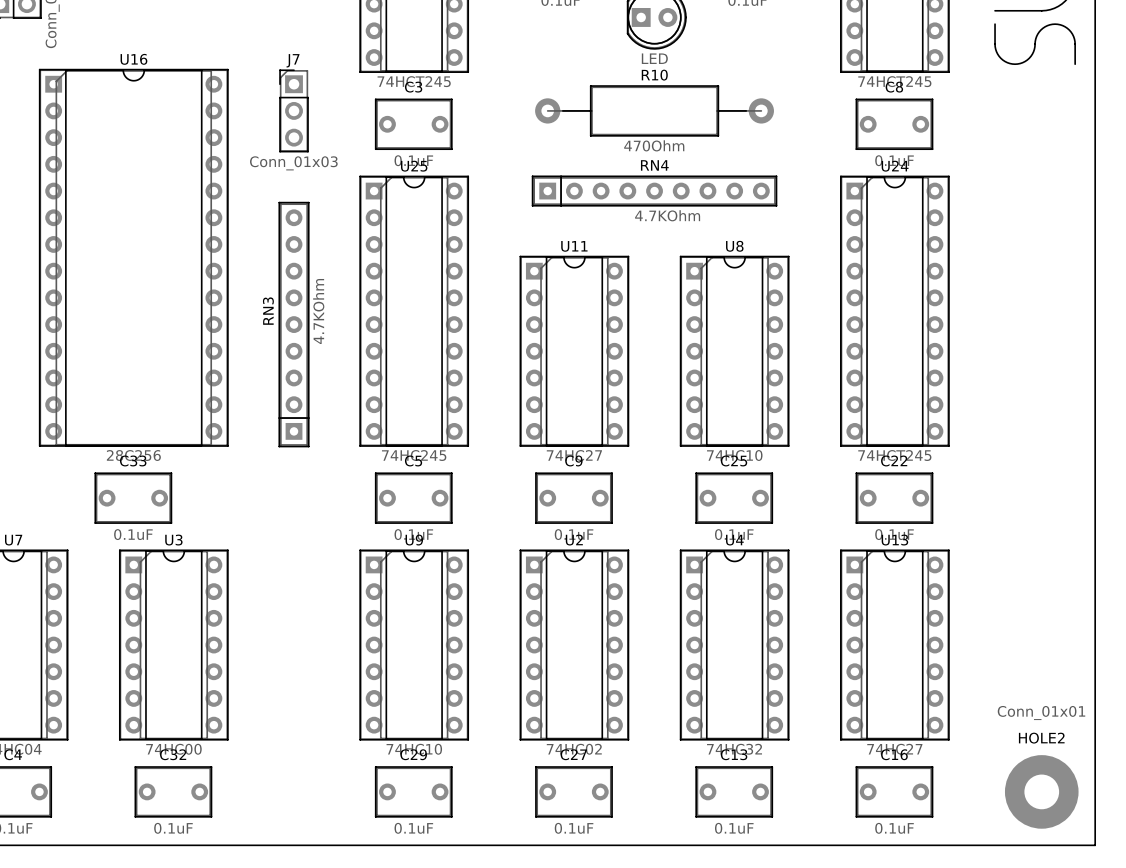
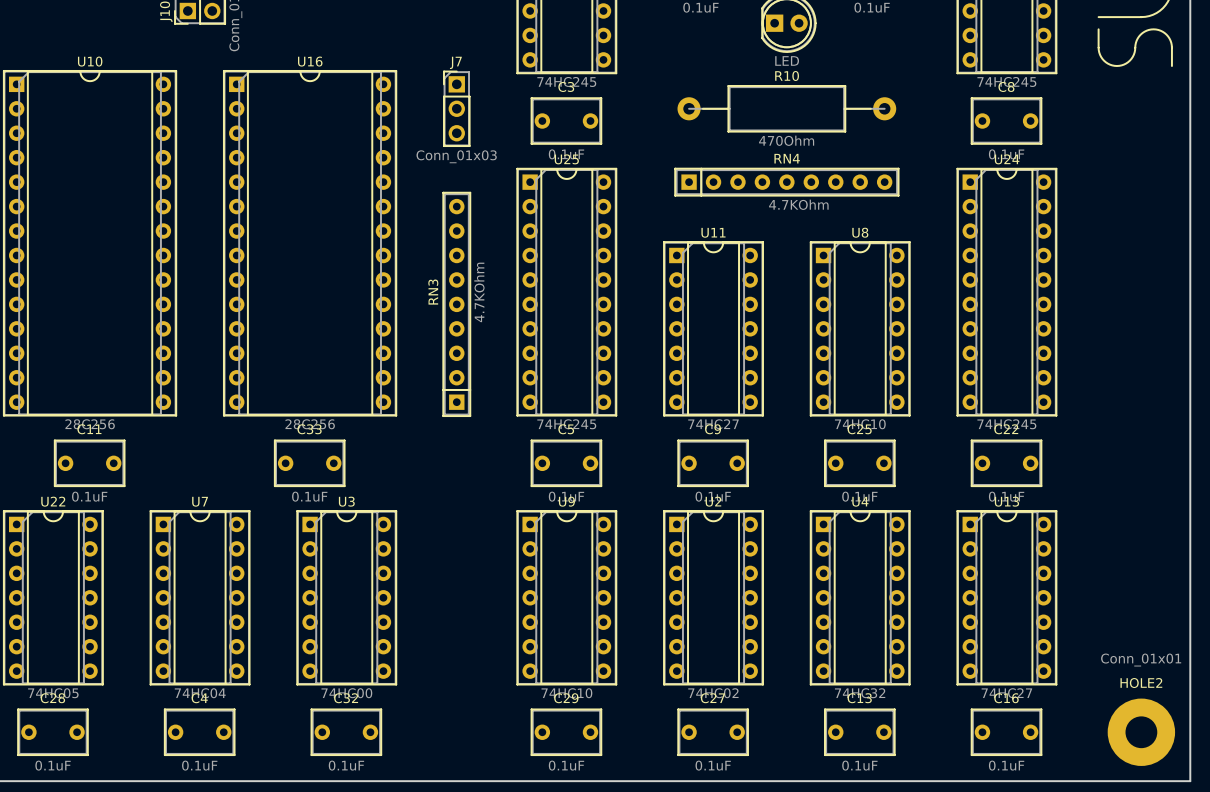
part value: 74HCT245 (414, 81) -> 74HC245 (566, 81)
part value: 74HCT245 (894, 81) -> 74HC245 (1006, 81)
U24 value: 74HCT245 (894, 455) -> 74HC245 (1006, 424)

